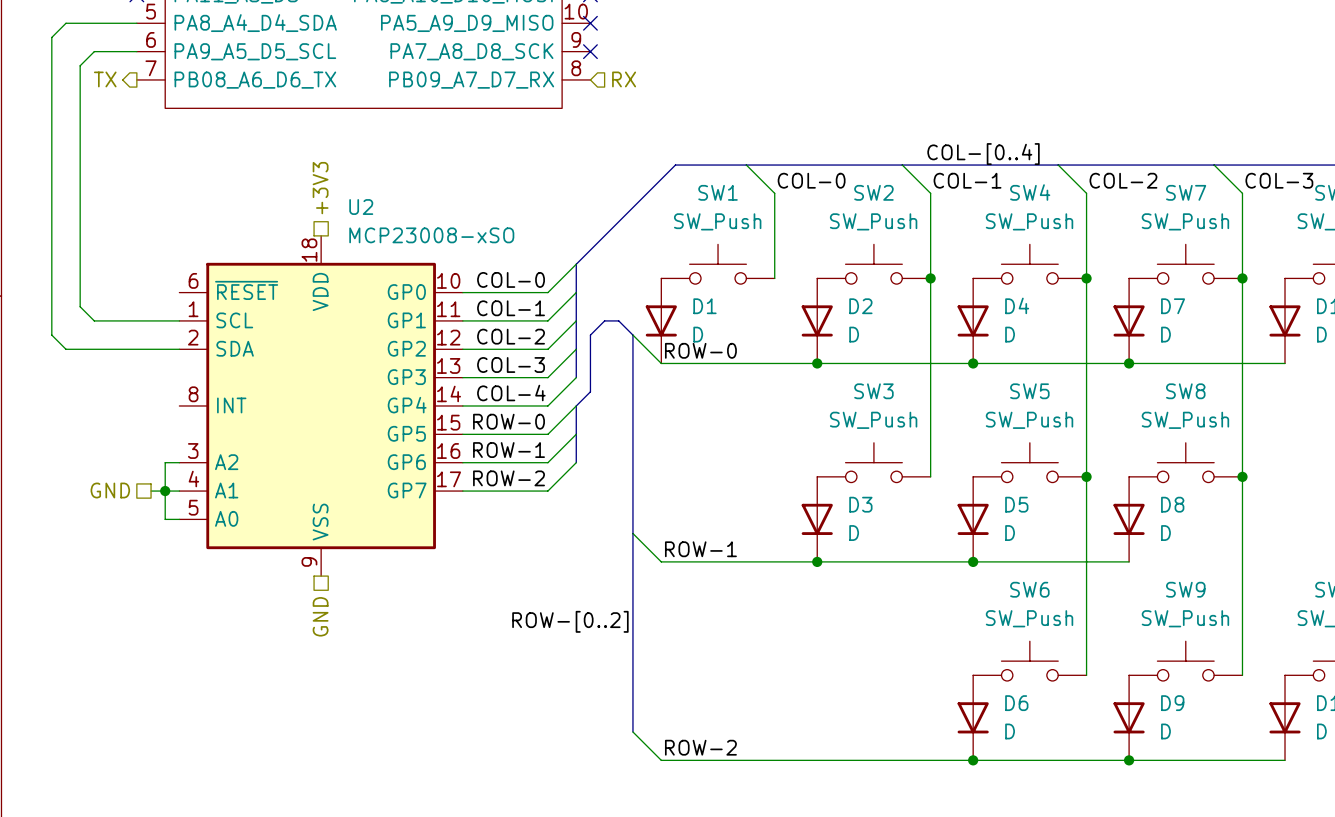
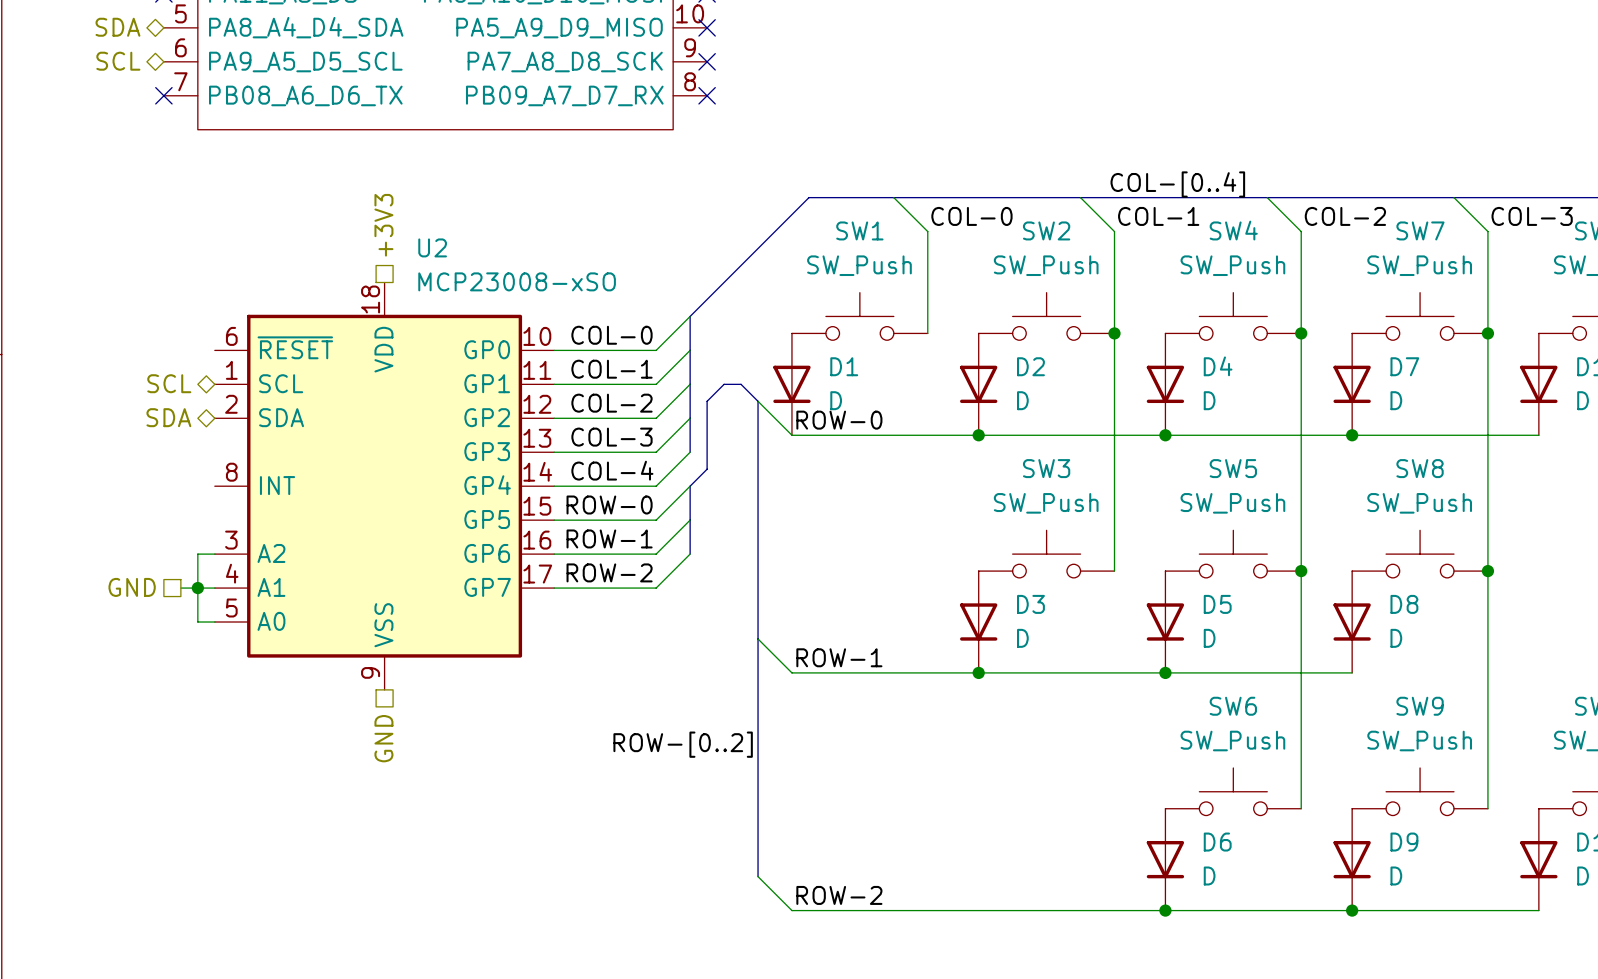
hierarchical label: none -> SDA (117, 27)
wire: (136, 23) (65, 23) (51, 37) (51, 335) (65, 349) (179, 349) -> none
hierarchical label: none -> SCL (118, 61)
wire: (136, 51) (94, 51) (80, 65) (80, 306) (94, 320) (179, 320) -> none
hierarchical label: TX (105, 79) -> none
no-connect mark: none -> (163, 95)
no-connect mark: none -> (707, 95)
hierarchical label: RX (624, 79) -> none
hierarchical label: none -> SCL (169, 383)
hierarchical label: none -> SDA (168, 417)

